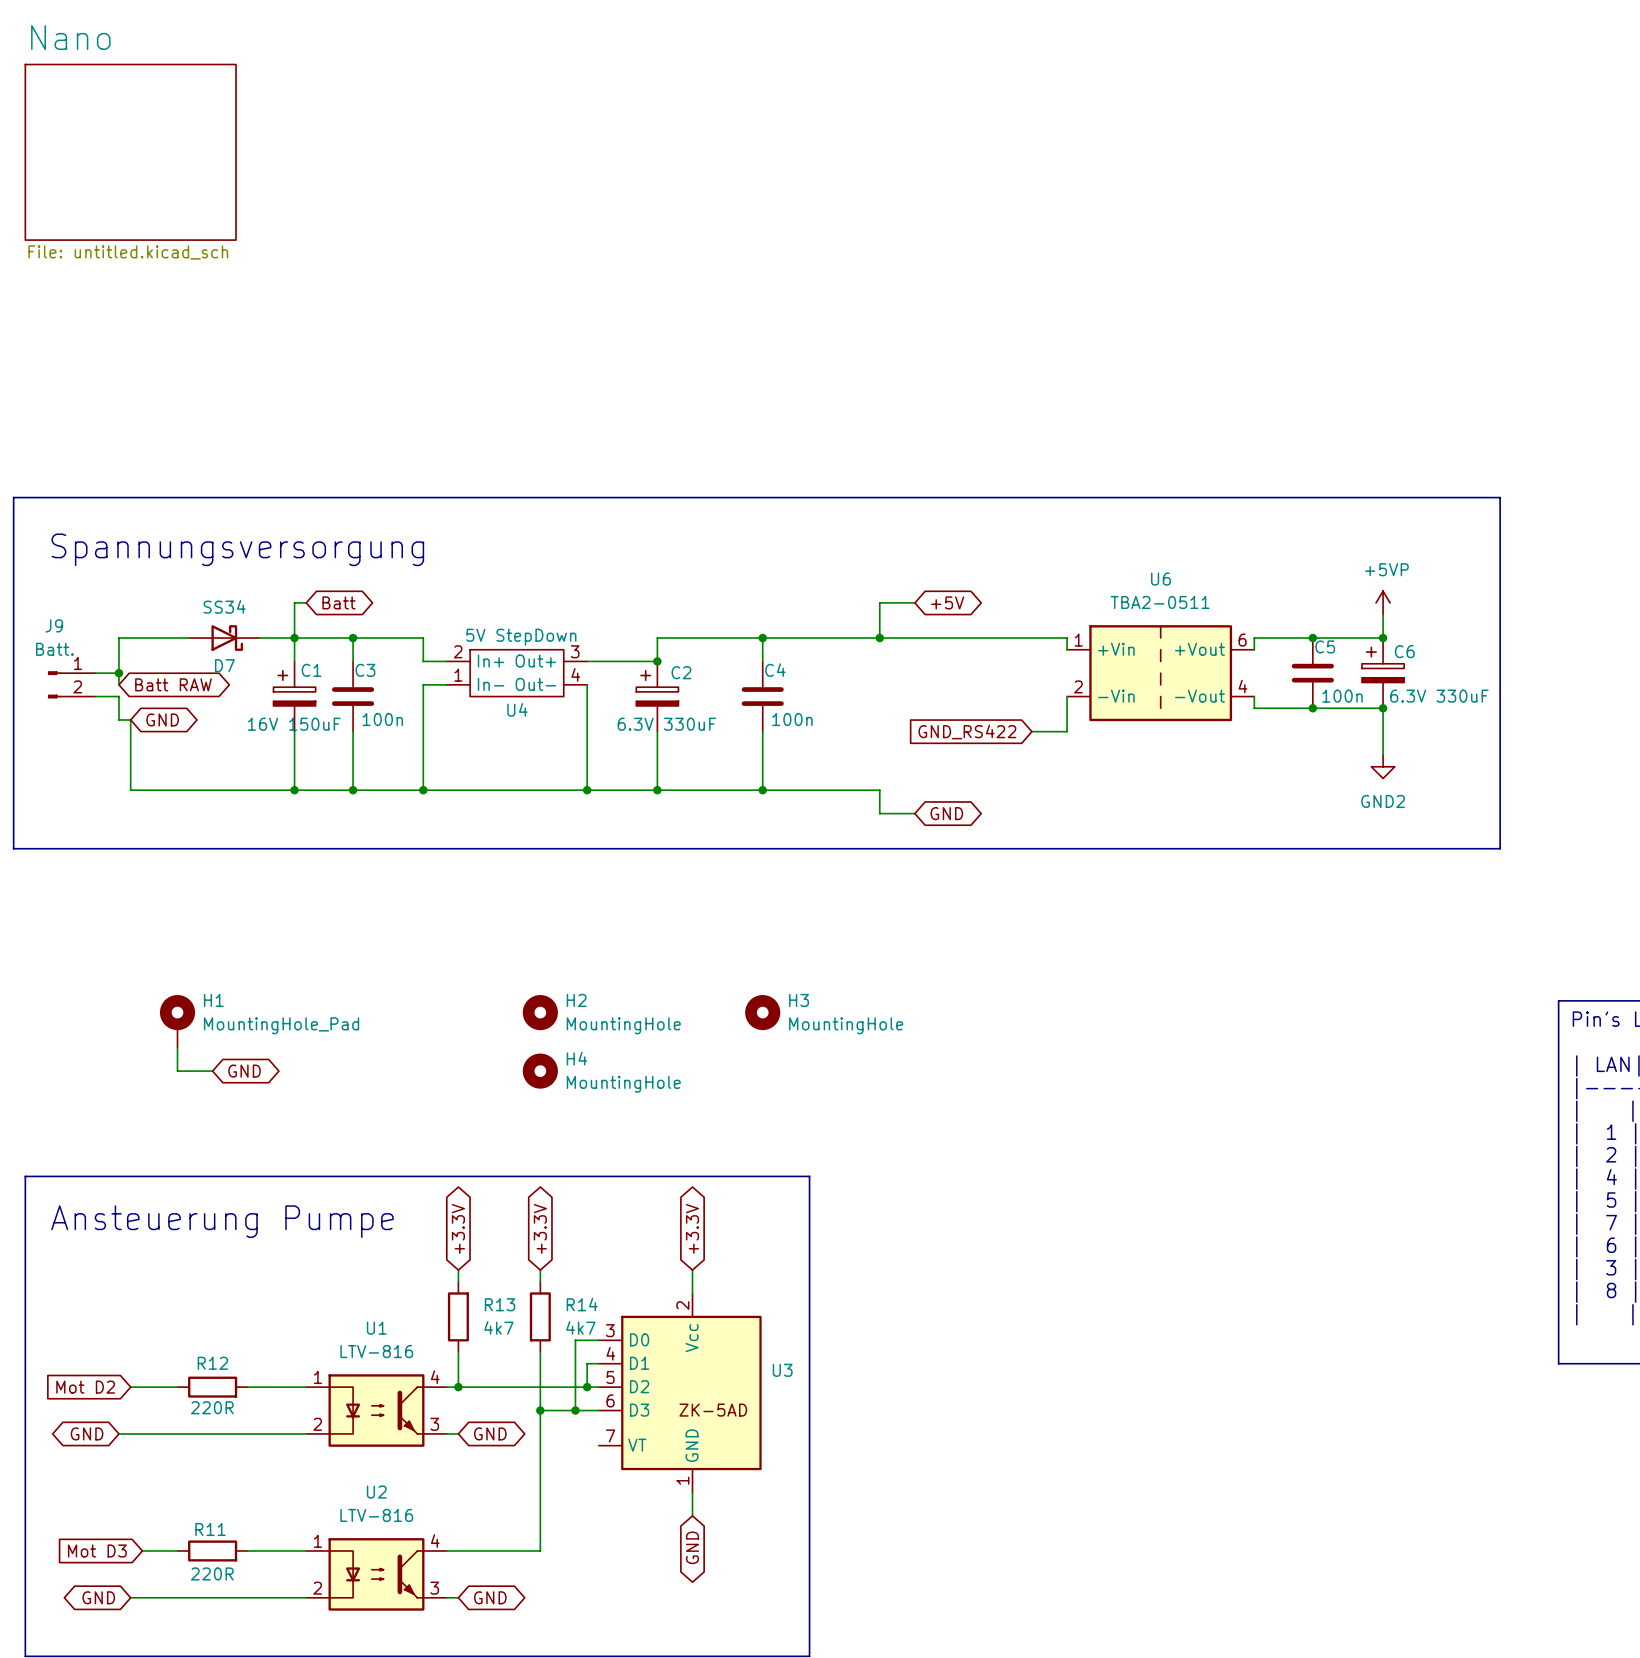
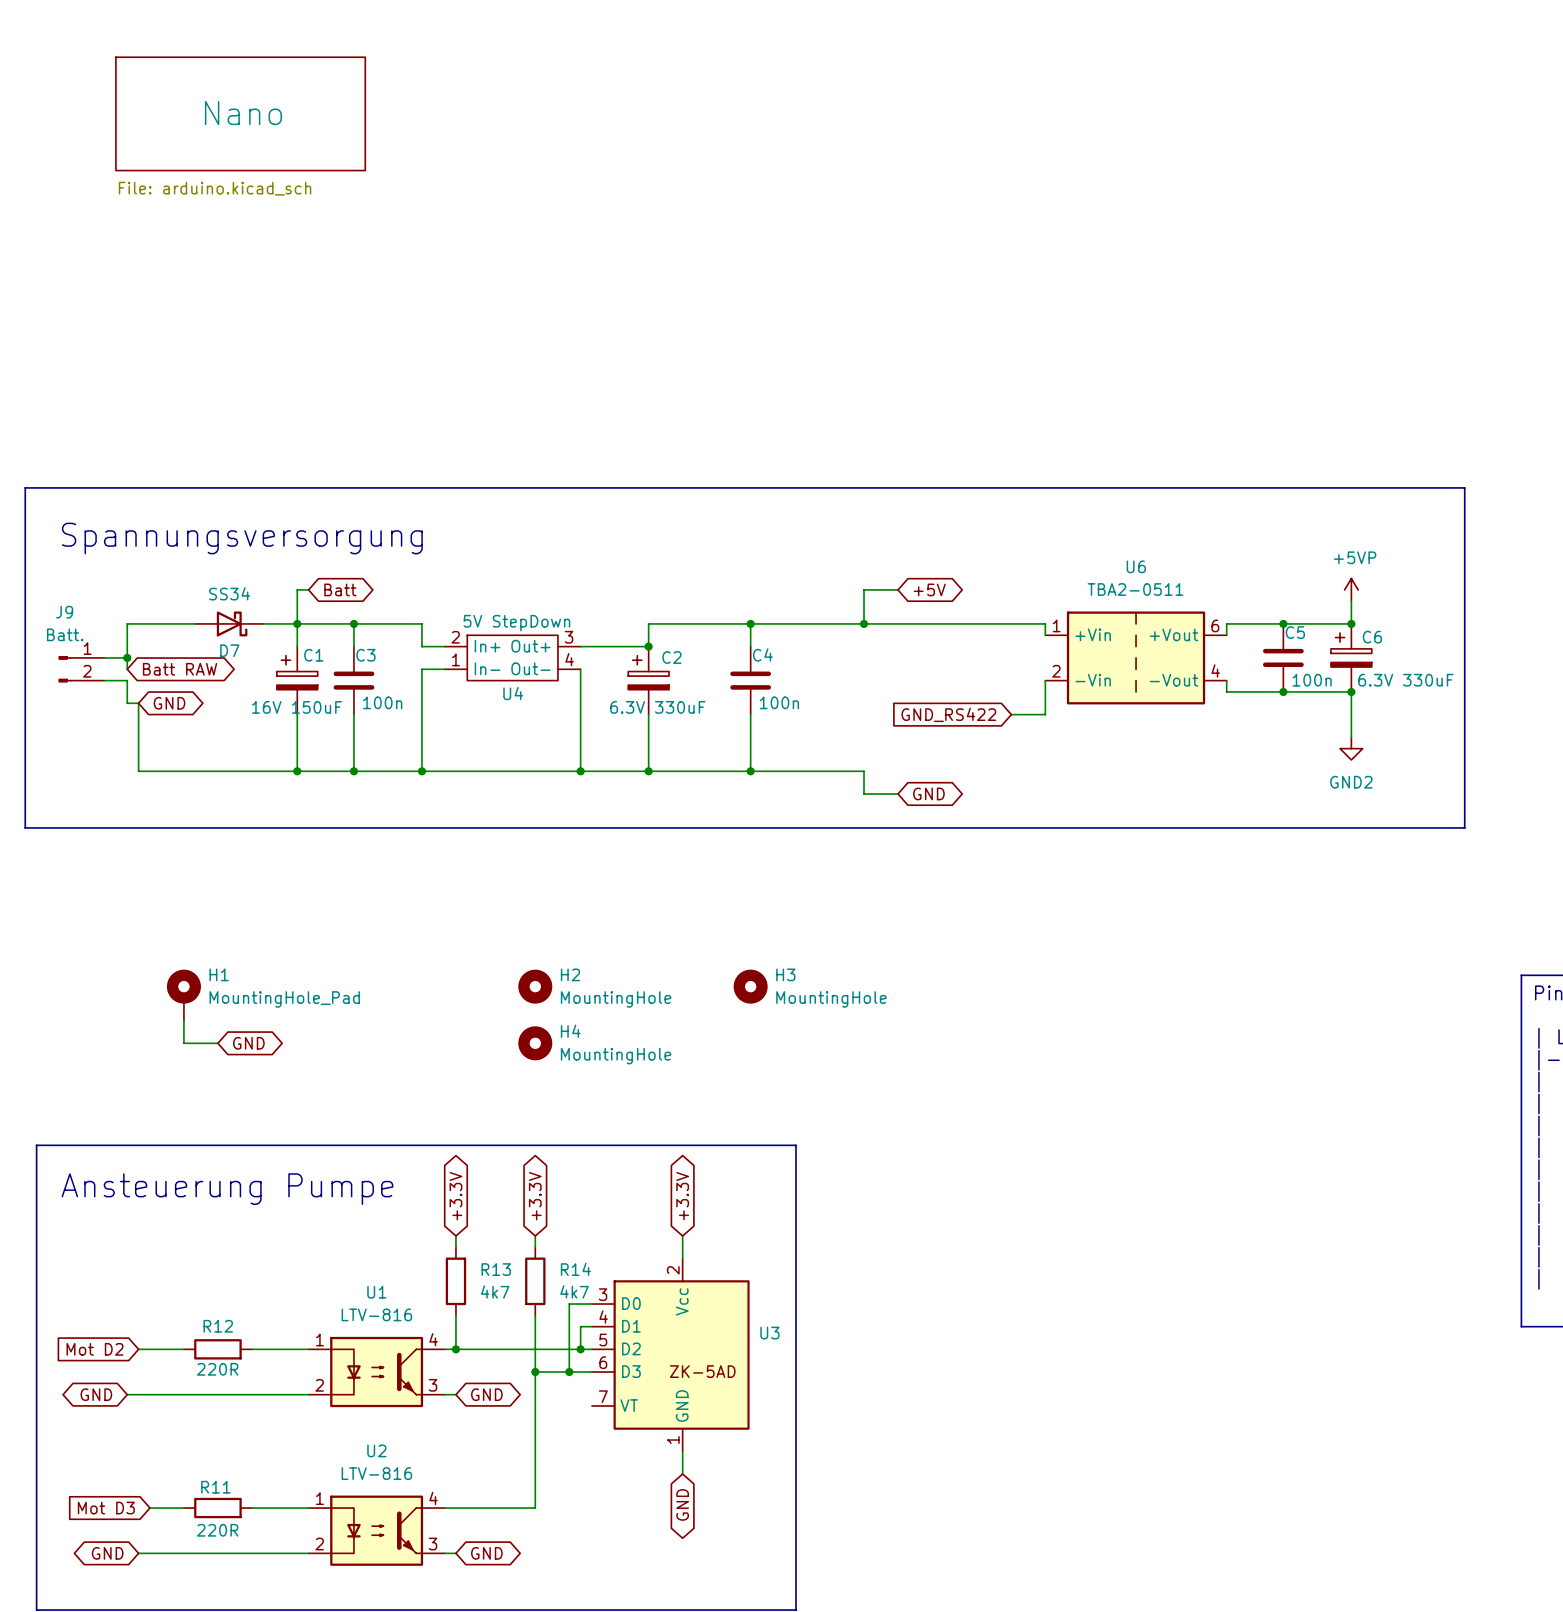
sheet Nano: none -> File: arduino.kicad_sch (240, 113)
sheet Nano: File: untitled.kicad_sch (130, 152) -> none

